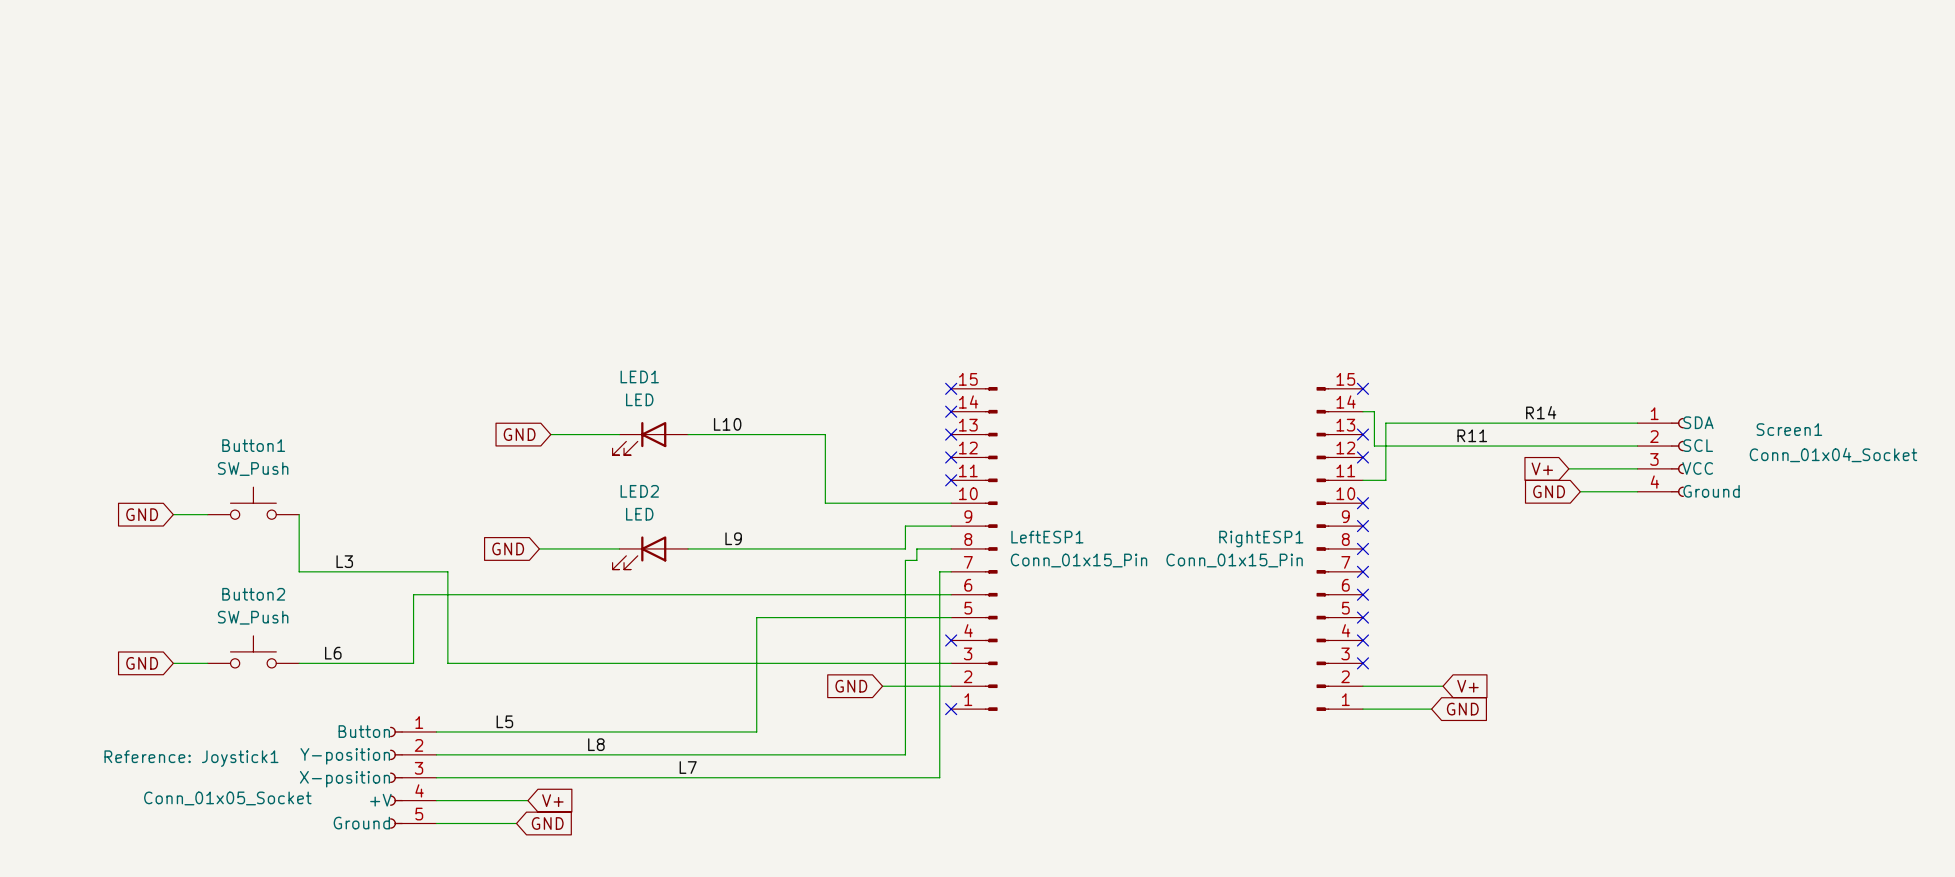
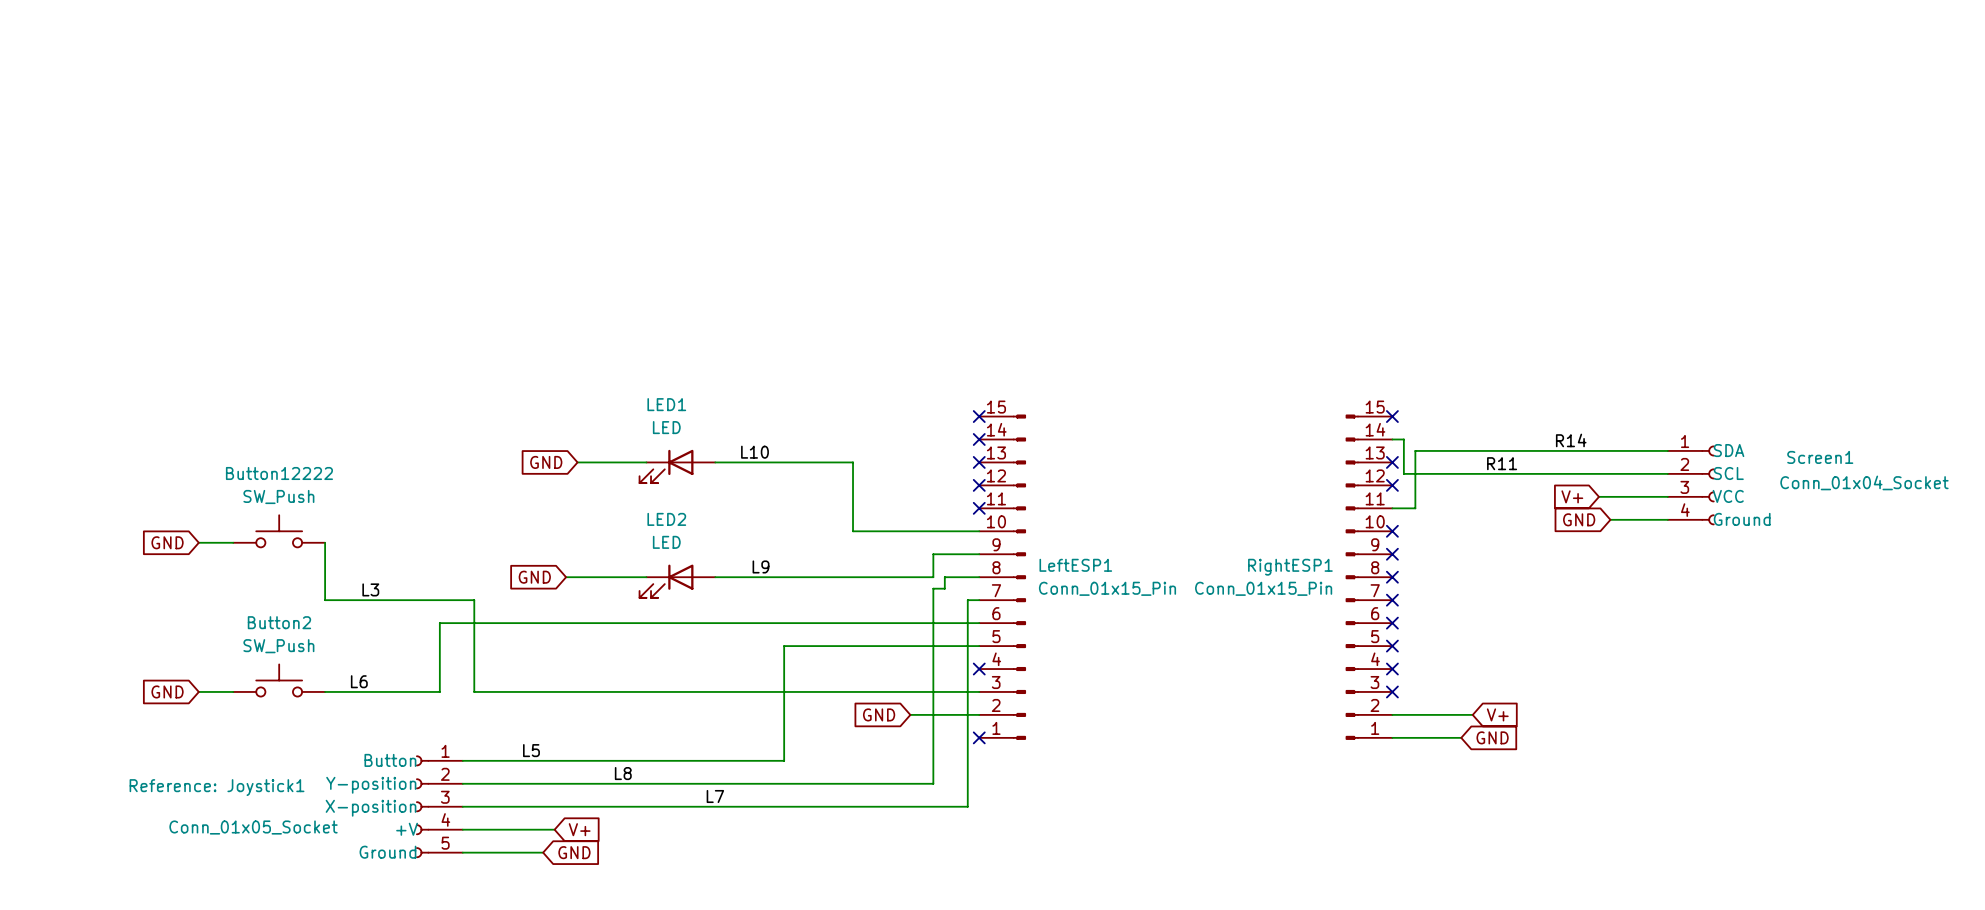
Button1 name: Button1 (253, 445) -> Button12222 (279, 473)

